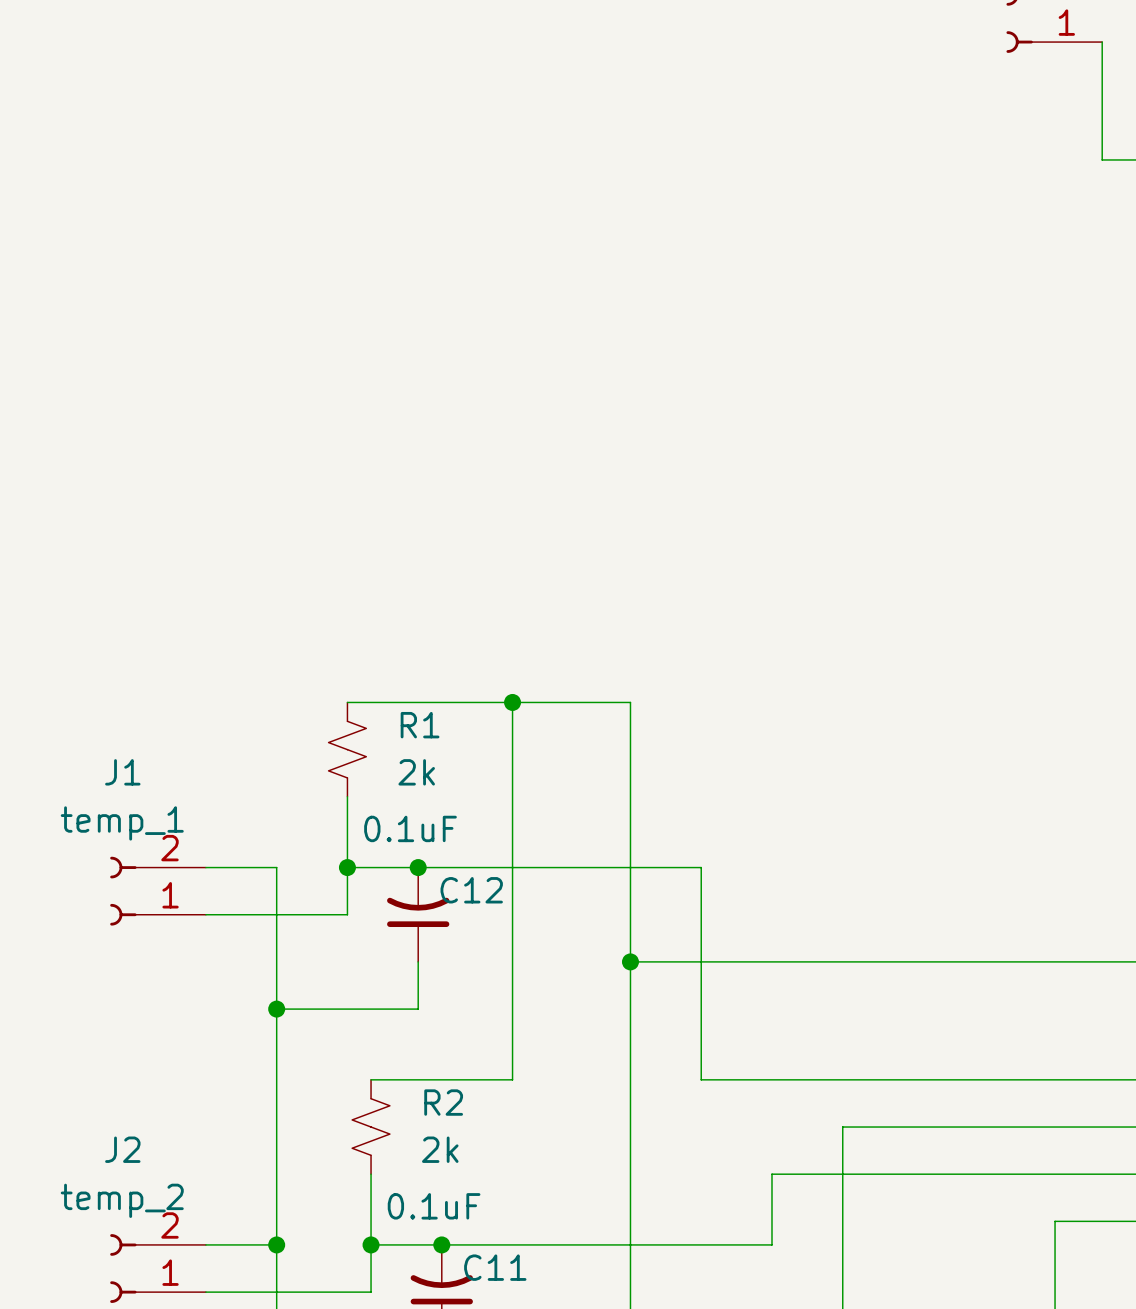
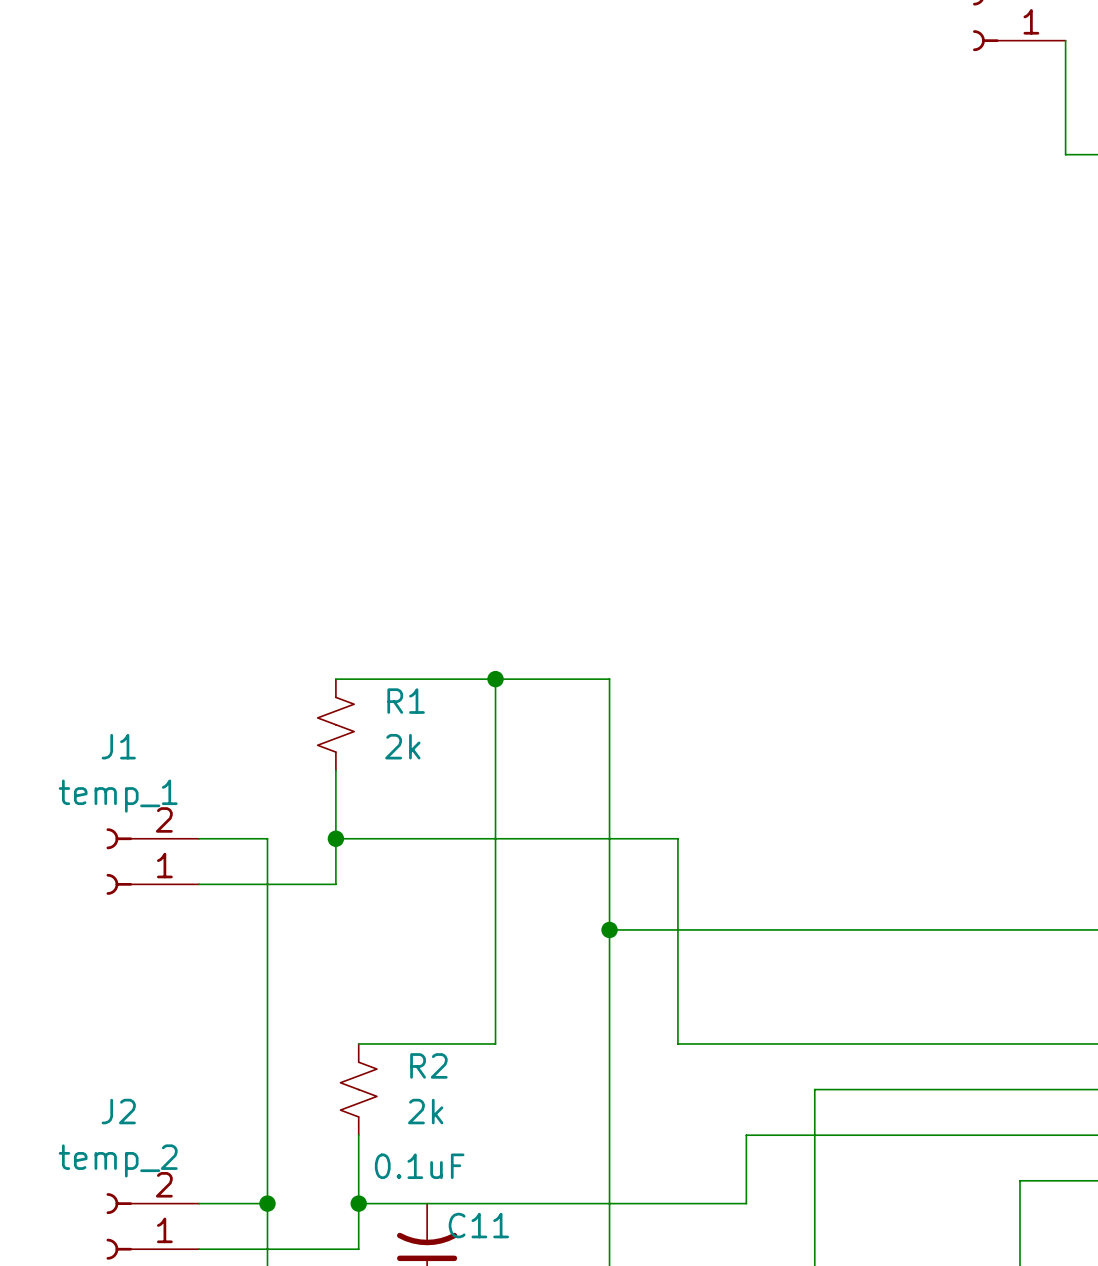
junction: (418, 867) -> none
C12: 0.1uF (418, 914) -> none
wire: (418, 961) (418, 1009) (276, 1009) -> none
junction: (276, 1009) -> none
junction: (441, 1244) -> none

